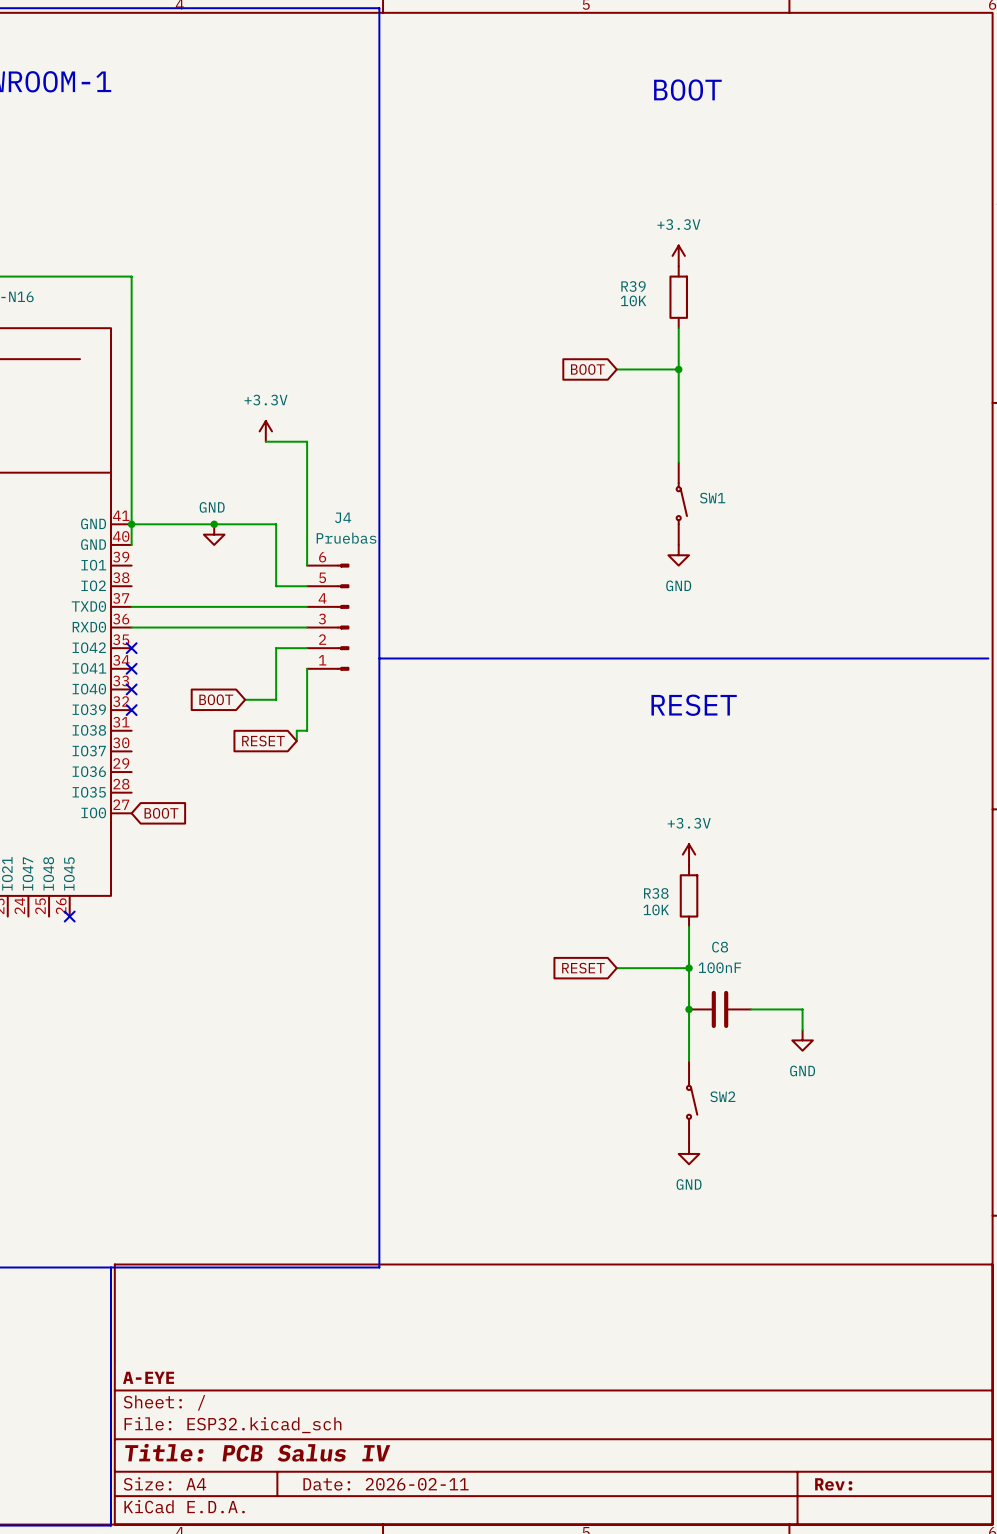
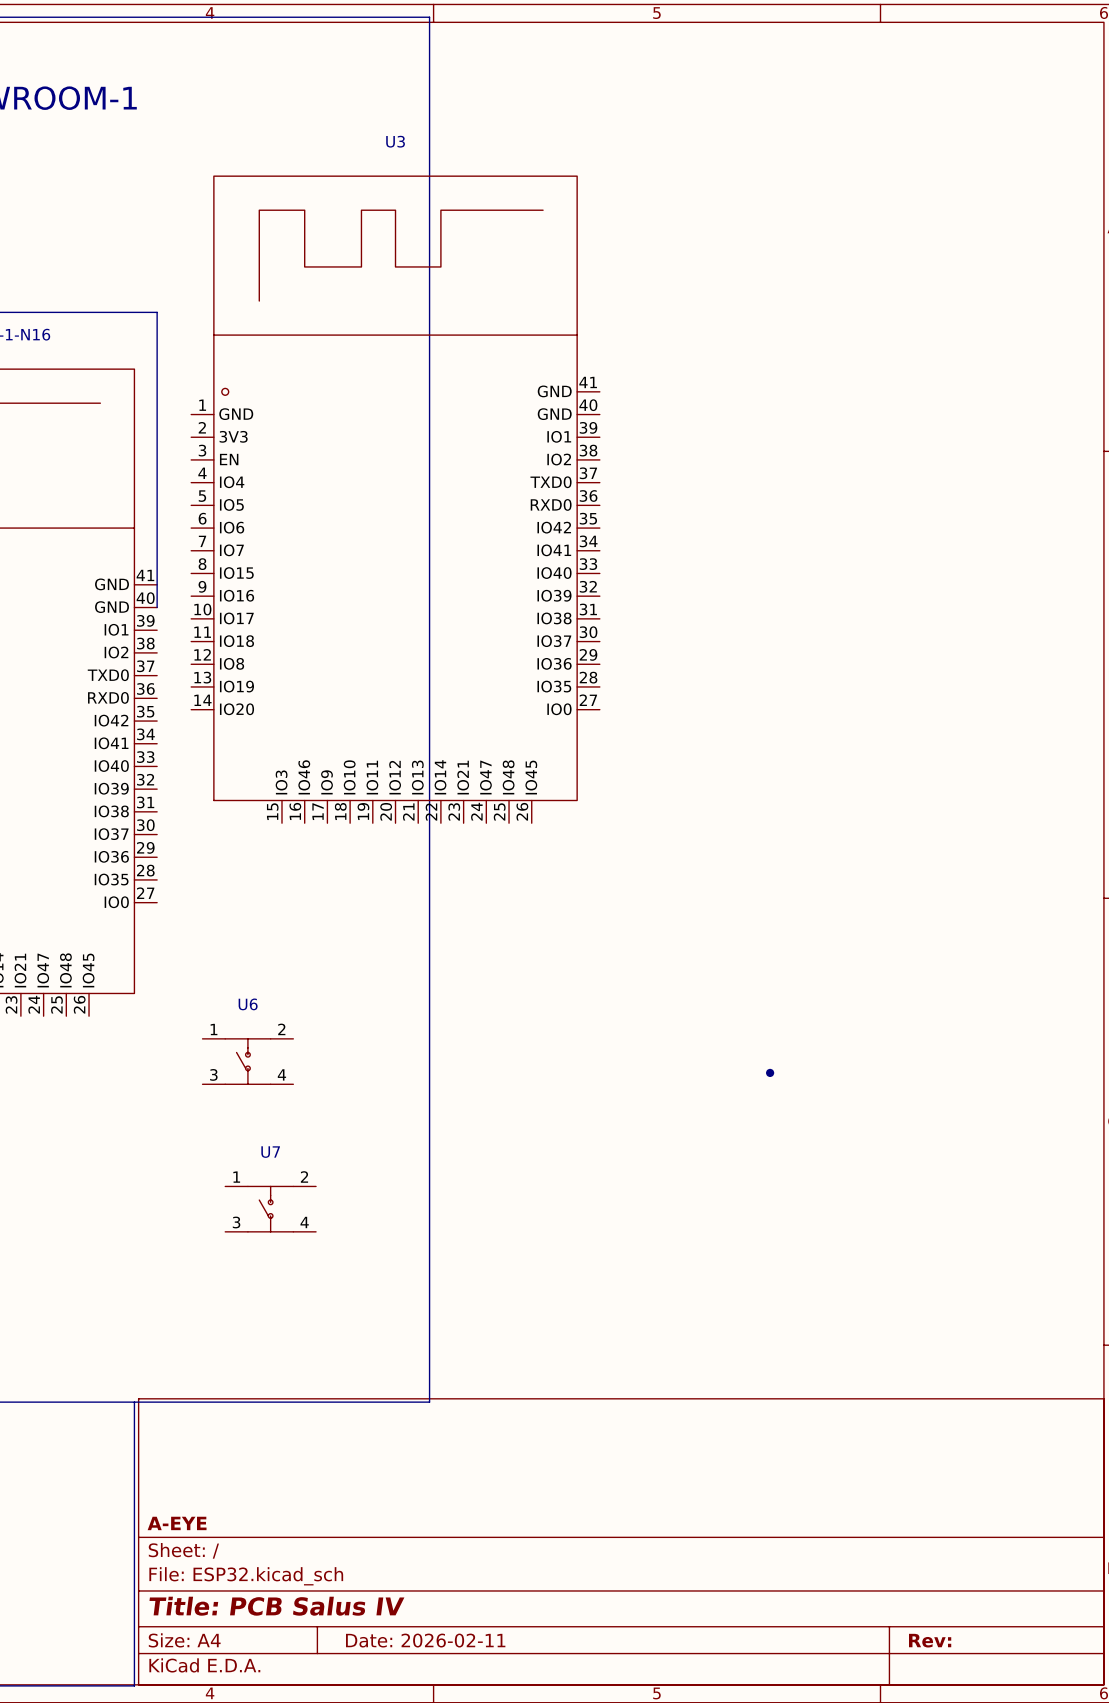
text: BOOT (687, 90) -> none
power symbol: +3.3V (678, 255) -> none
R39: 10K (678, 297) -> none
wire: (678, 328) (678, 462) -> none
global label: BOOT (587, 369) -> none
wire: (616, 369) (678, 369) -> none
junction: (678, 369) -> none
power symbol: +3.3V (265, 431) -> none
wire: (265, 441) (307, 441) (307, 565) -> none
U3: none -> (395, 499)
SW1: (681, 503) -> none
wire: (131, 524) (276, 524) (276, 586) (307, 586) -> none
junction: (131, 524) -> none
junction: (214, 524) -> none
power symbol: GND (214, 534) -> none
power symbol: GND (678, 555) -> none
wire: (131, 606) (307, 606) -> none
J4: Pruebas (328, 617) -> none
wire: (131, 627) (307, 627) -> none
no-connect mark: (131, 648) -> none
wire: (307, 648) (276, 648) (276, 699) (245, 699) -> none
line: (379, 658) (988, 658) -> none
no-connect mark: (131, 668) -> none
wire: (307, 668) (307, 730) (296, 730) (296, 741) -> none
no-connect mark: (131, 689) -> none
global label: BOOT (216, 699) -> none
text: RESET (694, 705) -> none
no-connect mark: (131, 710) -> none
global label: RESET (263, 741) -> none
global label: BOOT (161, 813) -> none
power symbol: +3.3V (689, 854) -> none
R38: 10K (689, 895) -> none
no-connect mark: (69, 916) -> none
wire: (689, 926) (689, 1061) -> none
U6: none -> (247, 1061)
global label: RESET (583, 968) -> none
wire: (616, 968) (689, 968) -> none
junction: (689, 1009) -> none
C8: 100nF (720, 1009) -> none
wire: (750, 1009) (802, 1009) (802, 1030) -> none
power symbol: GND (802, 1040) -> none
U7: none -> (270, 1209)
SW2: (692, 1102) -> none
power symbol: GND (689, 1153) -> none

